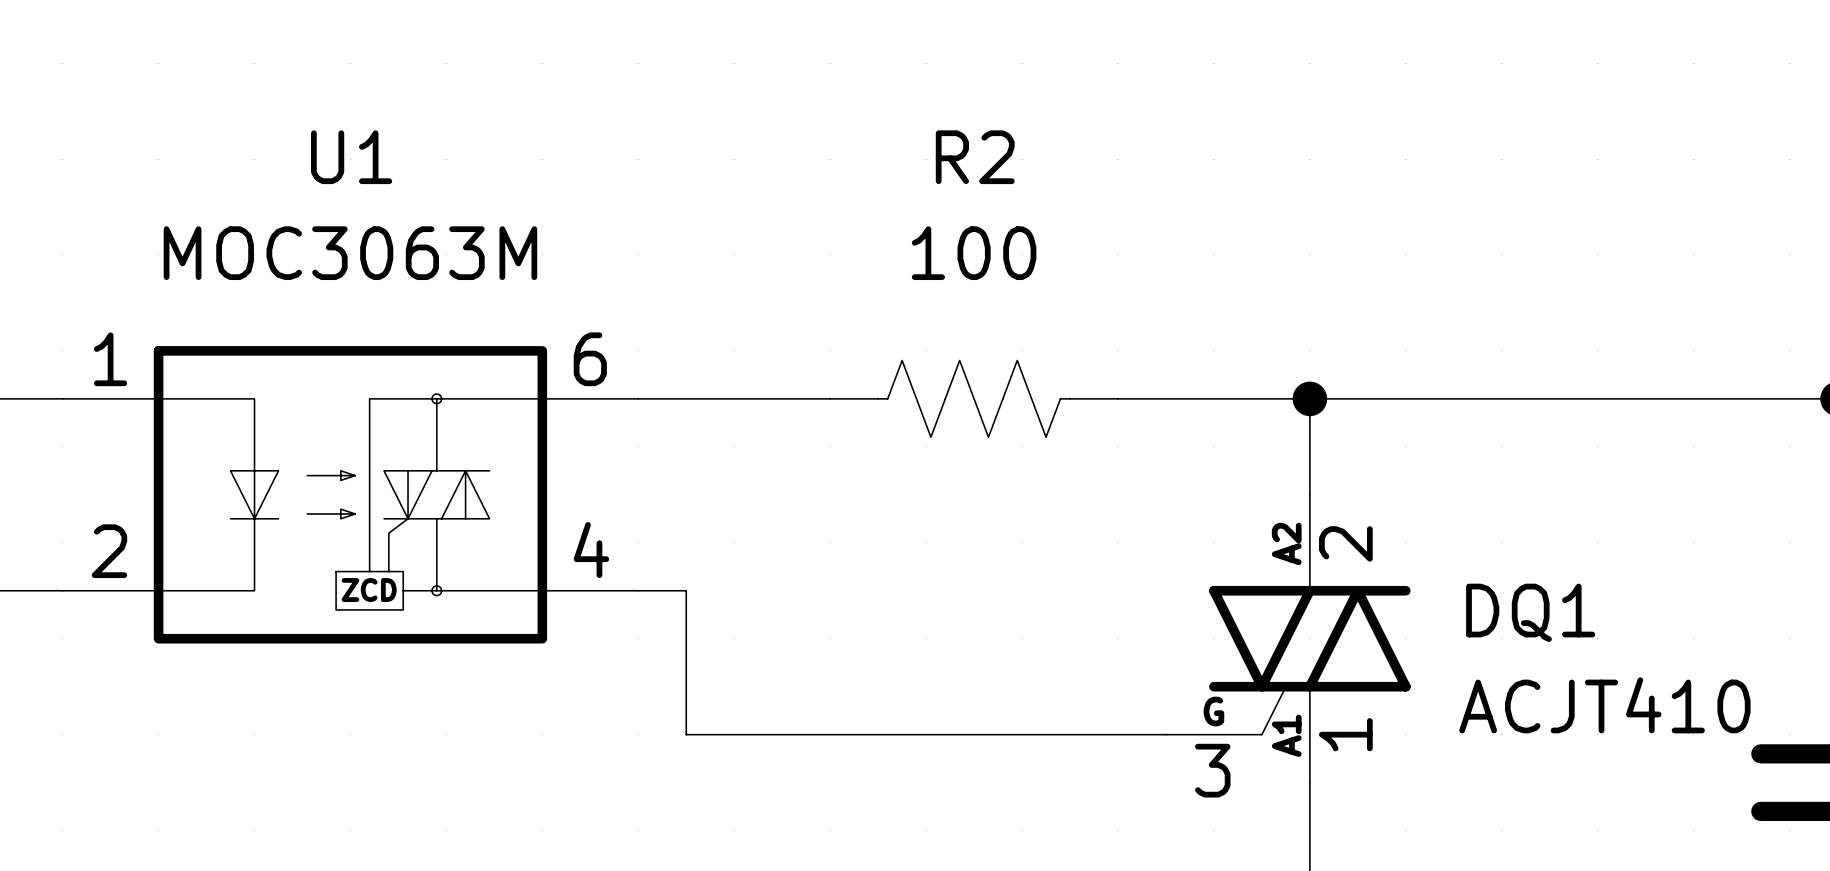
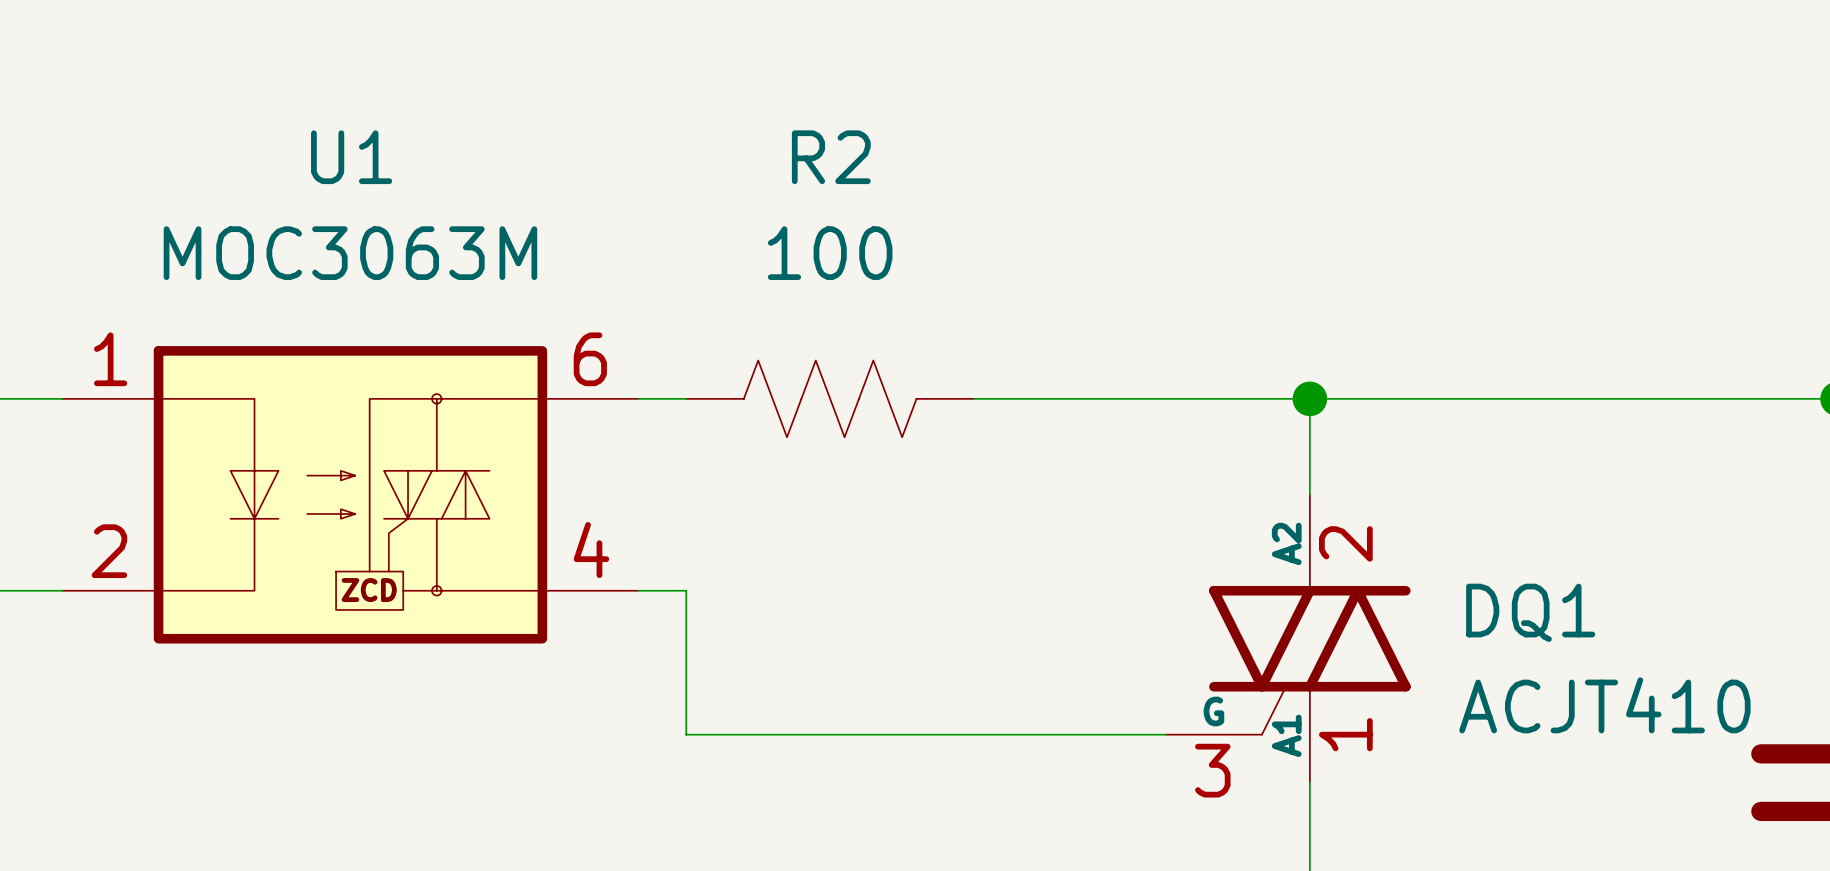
wire: (686, 398) (830, 398) -> (974, 398) (1117, 398)
R2 position: (974, 398) -> (830, 398)

